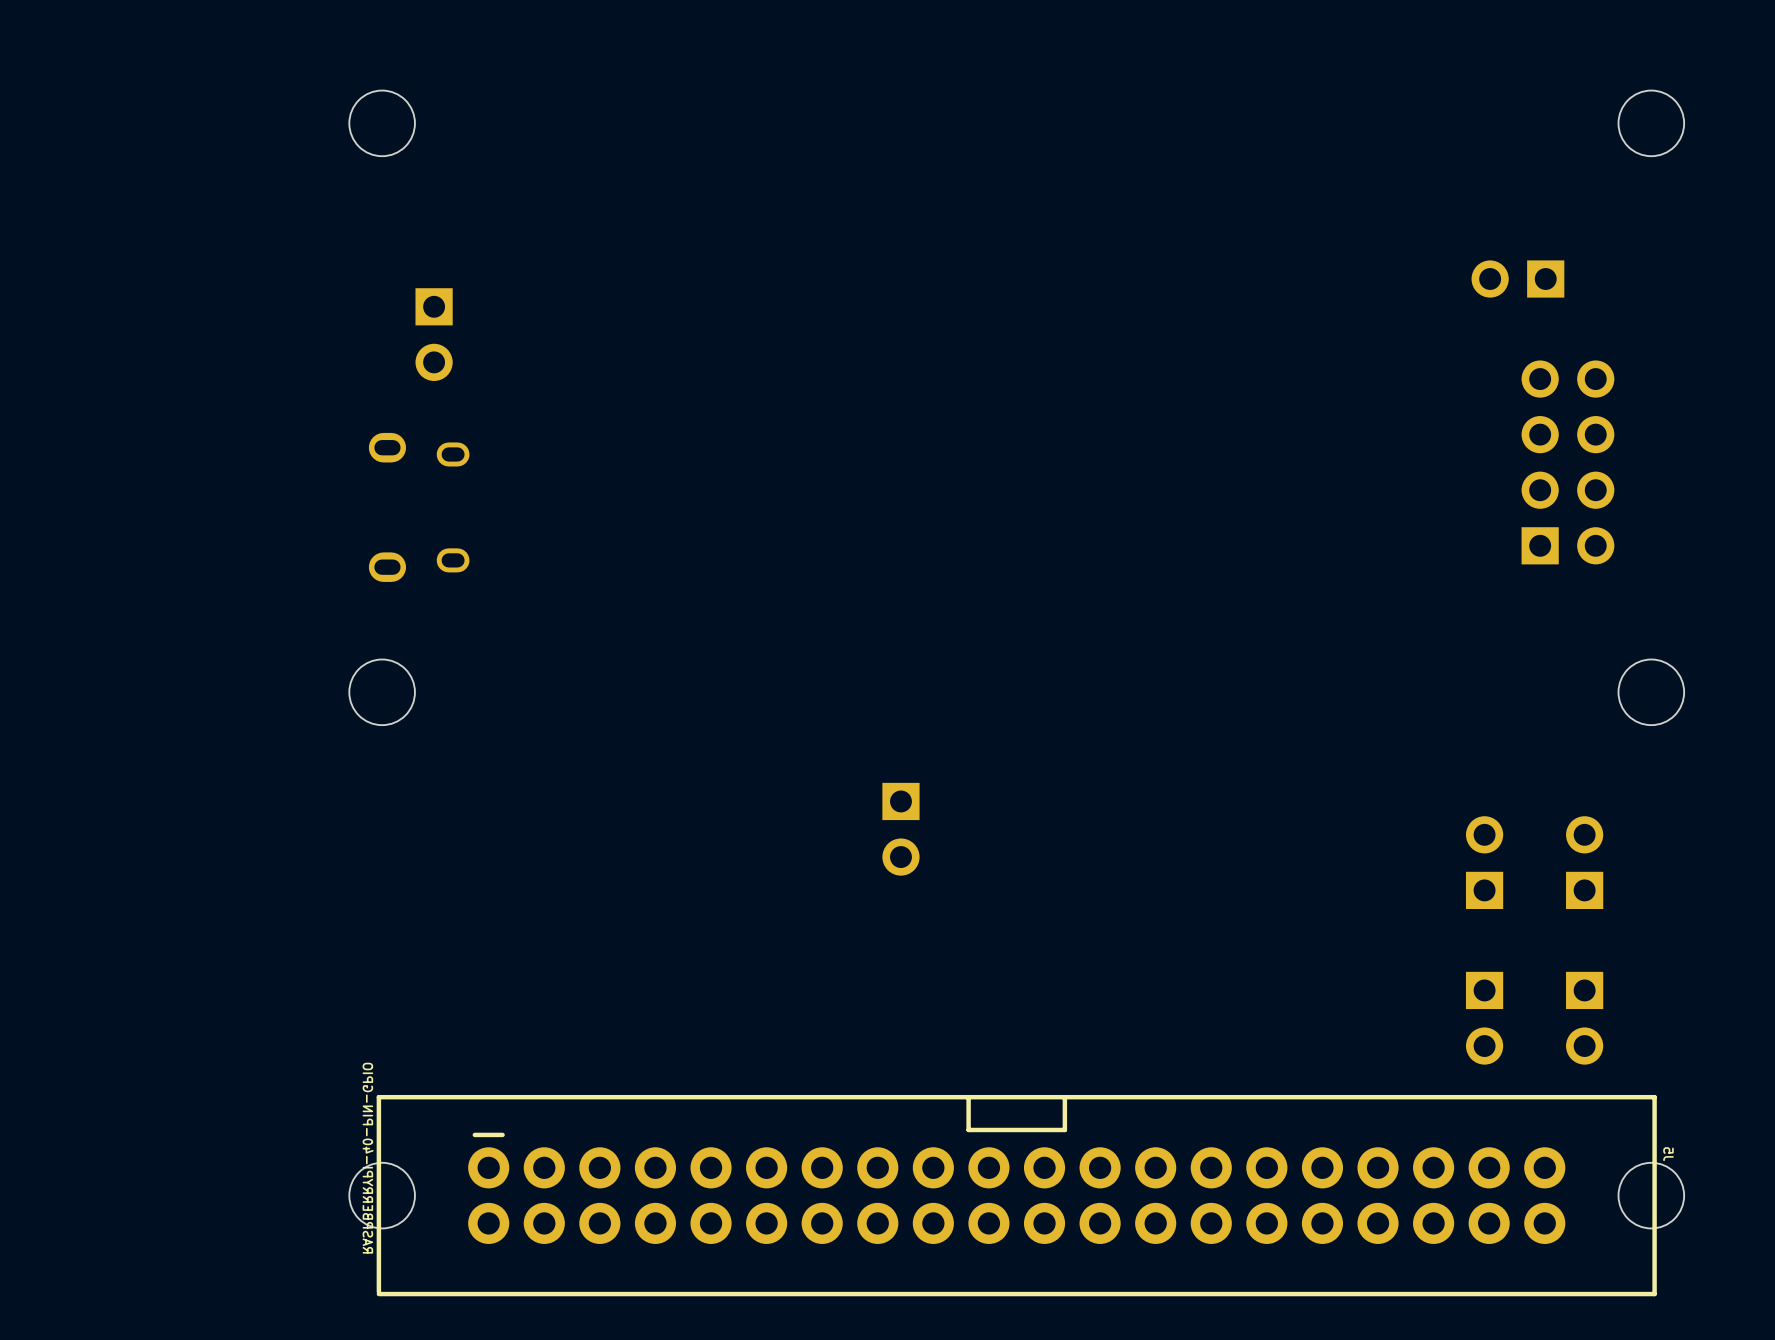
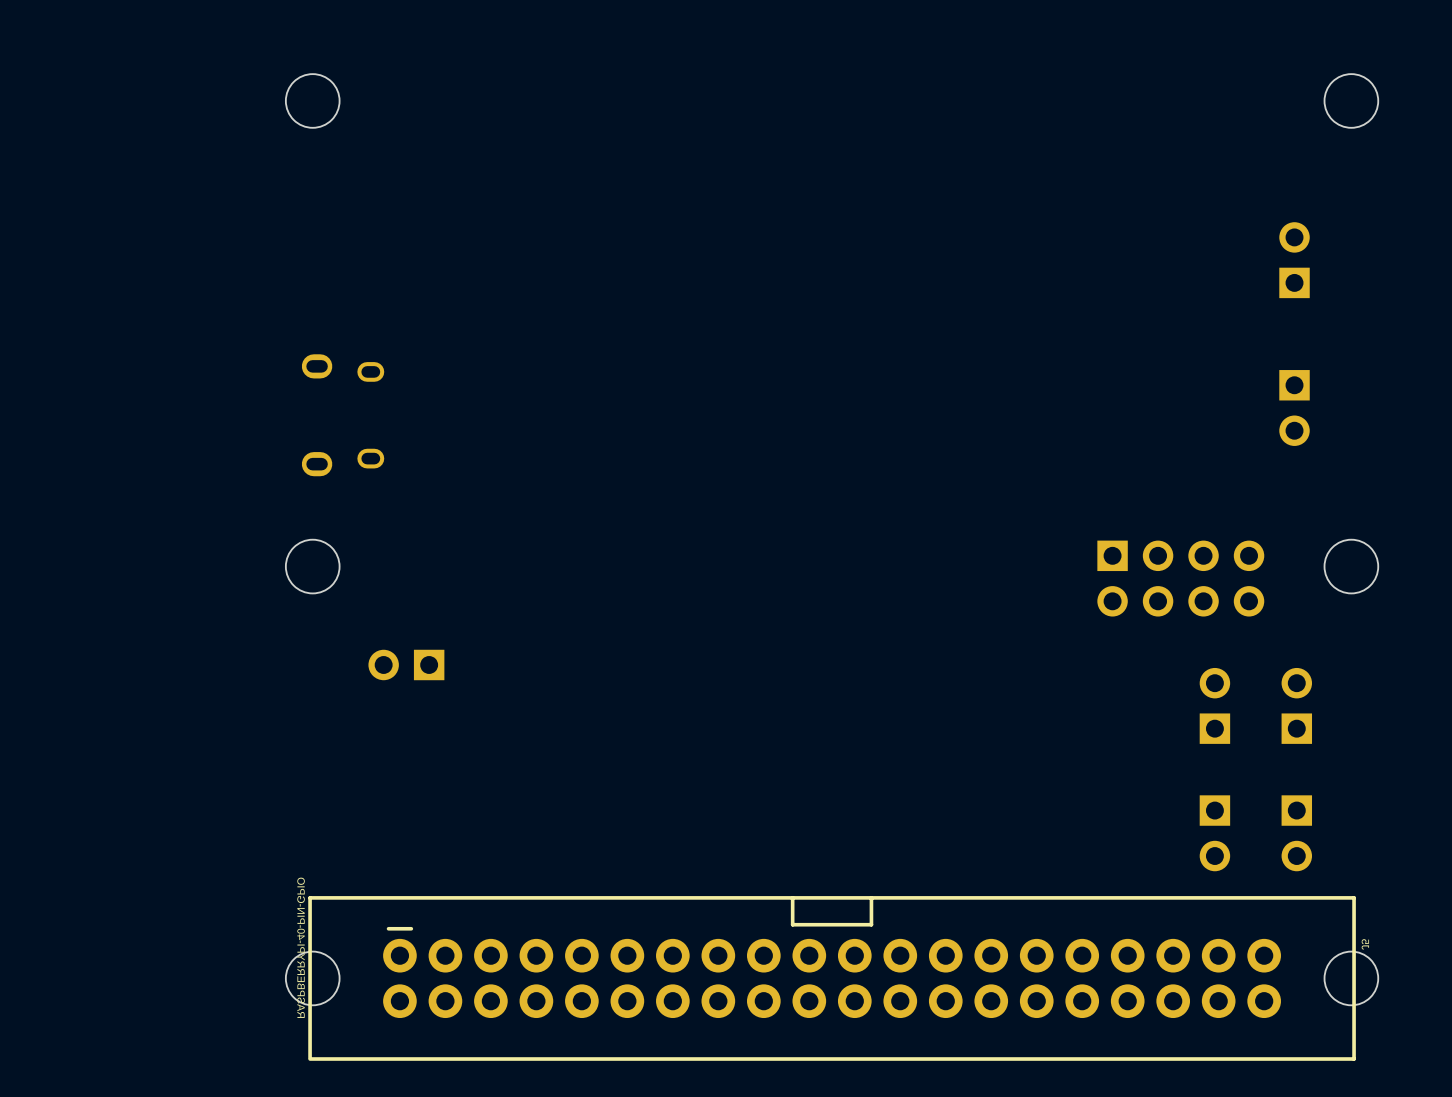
part rotation: 0° (1517, 279) -> 90° clockwise (1294, 260)
part position: (1517, 279) -> (1294, 260)
part: (434, 334) -> none
part rotation: 0° (1567, 462) -> 90° clockwise (1180, 578)
part position: (1567, 462) -> (1180, 578)
part: none -> (1294, 407)
part: none -> (406, 664)
part: (900, 829) -> none

